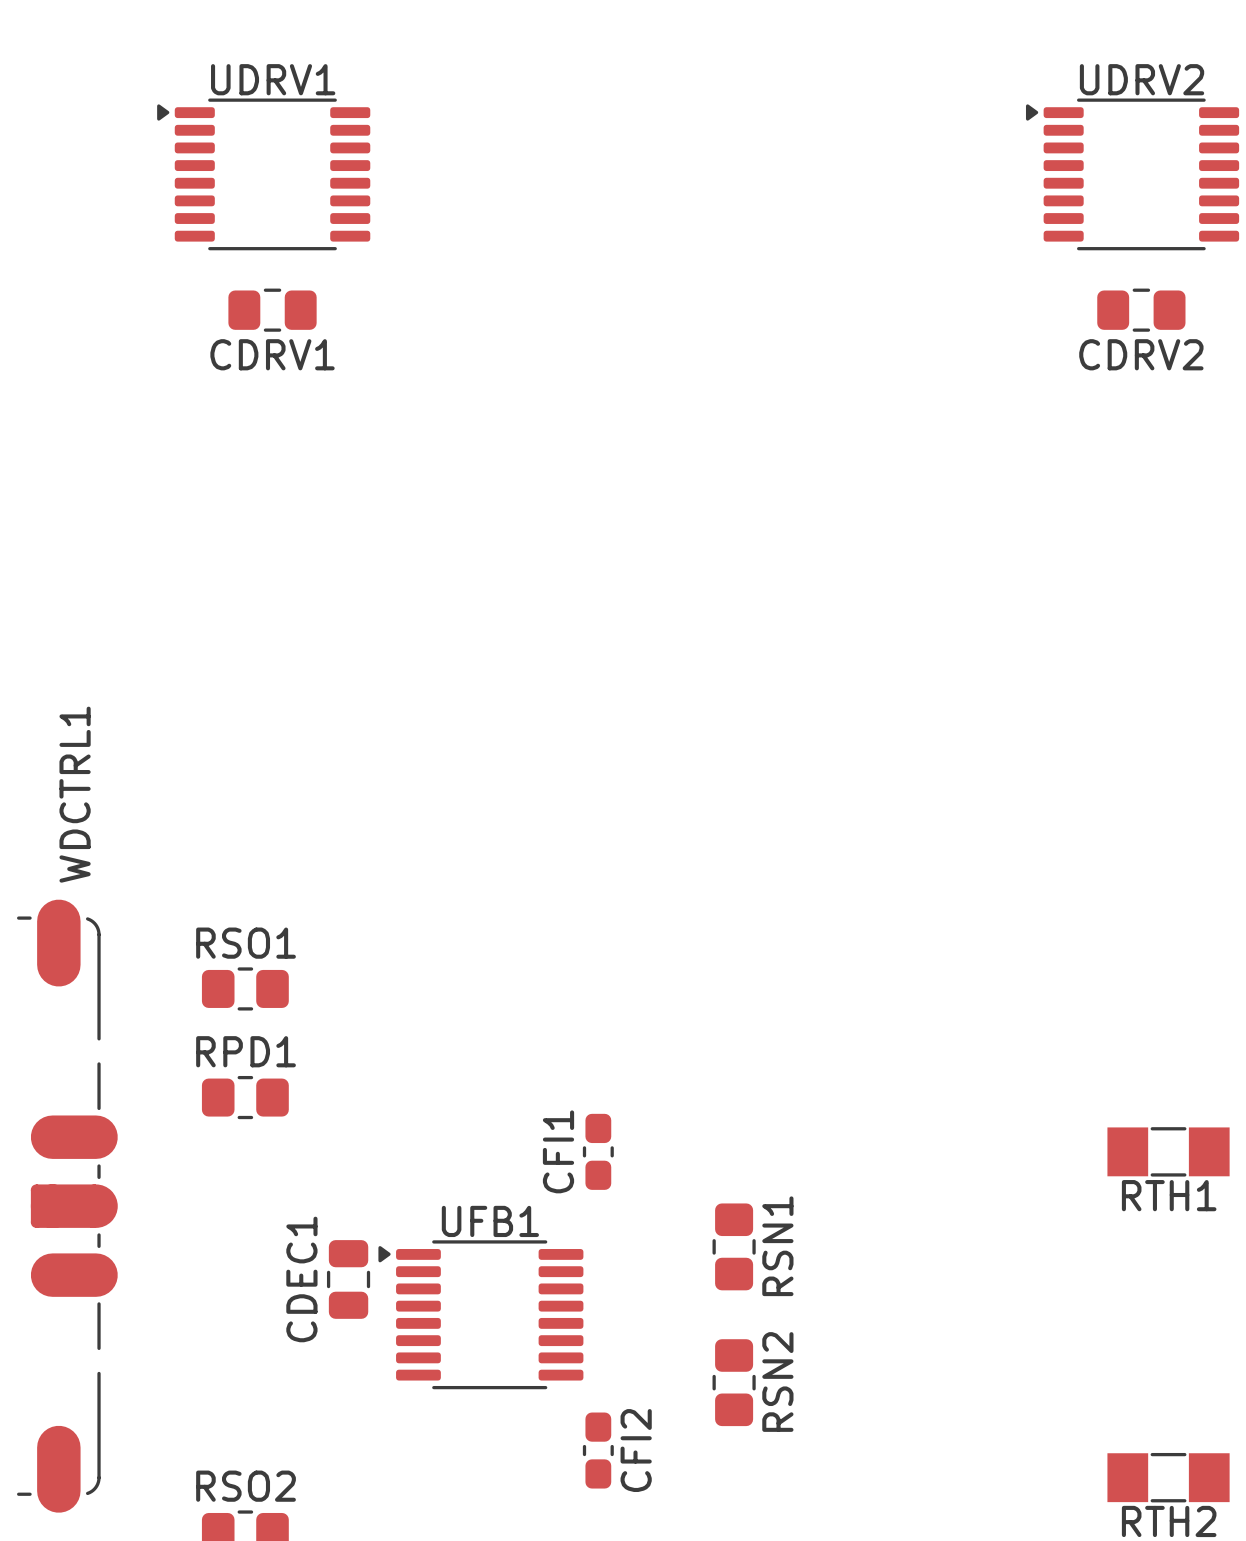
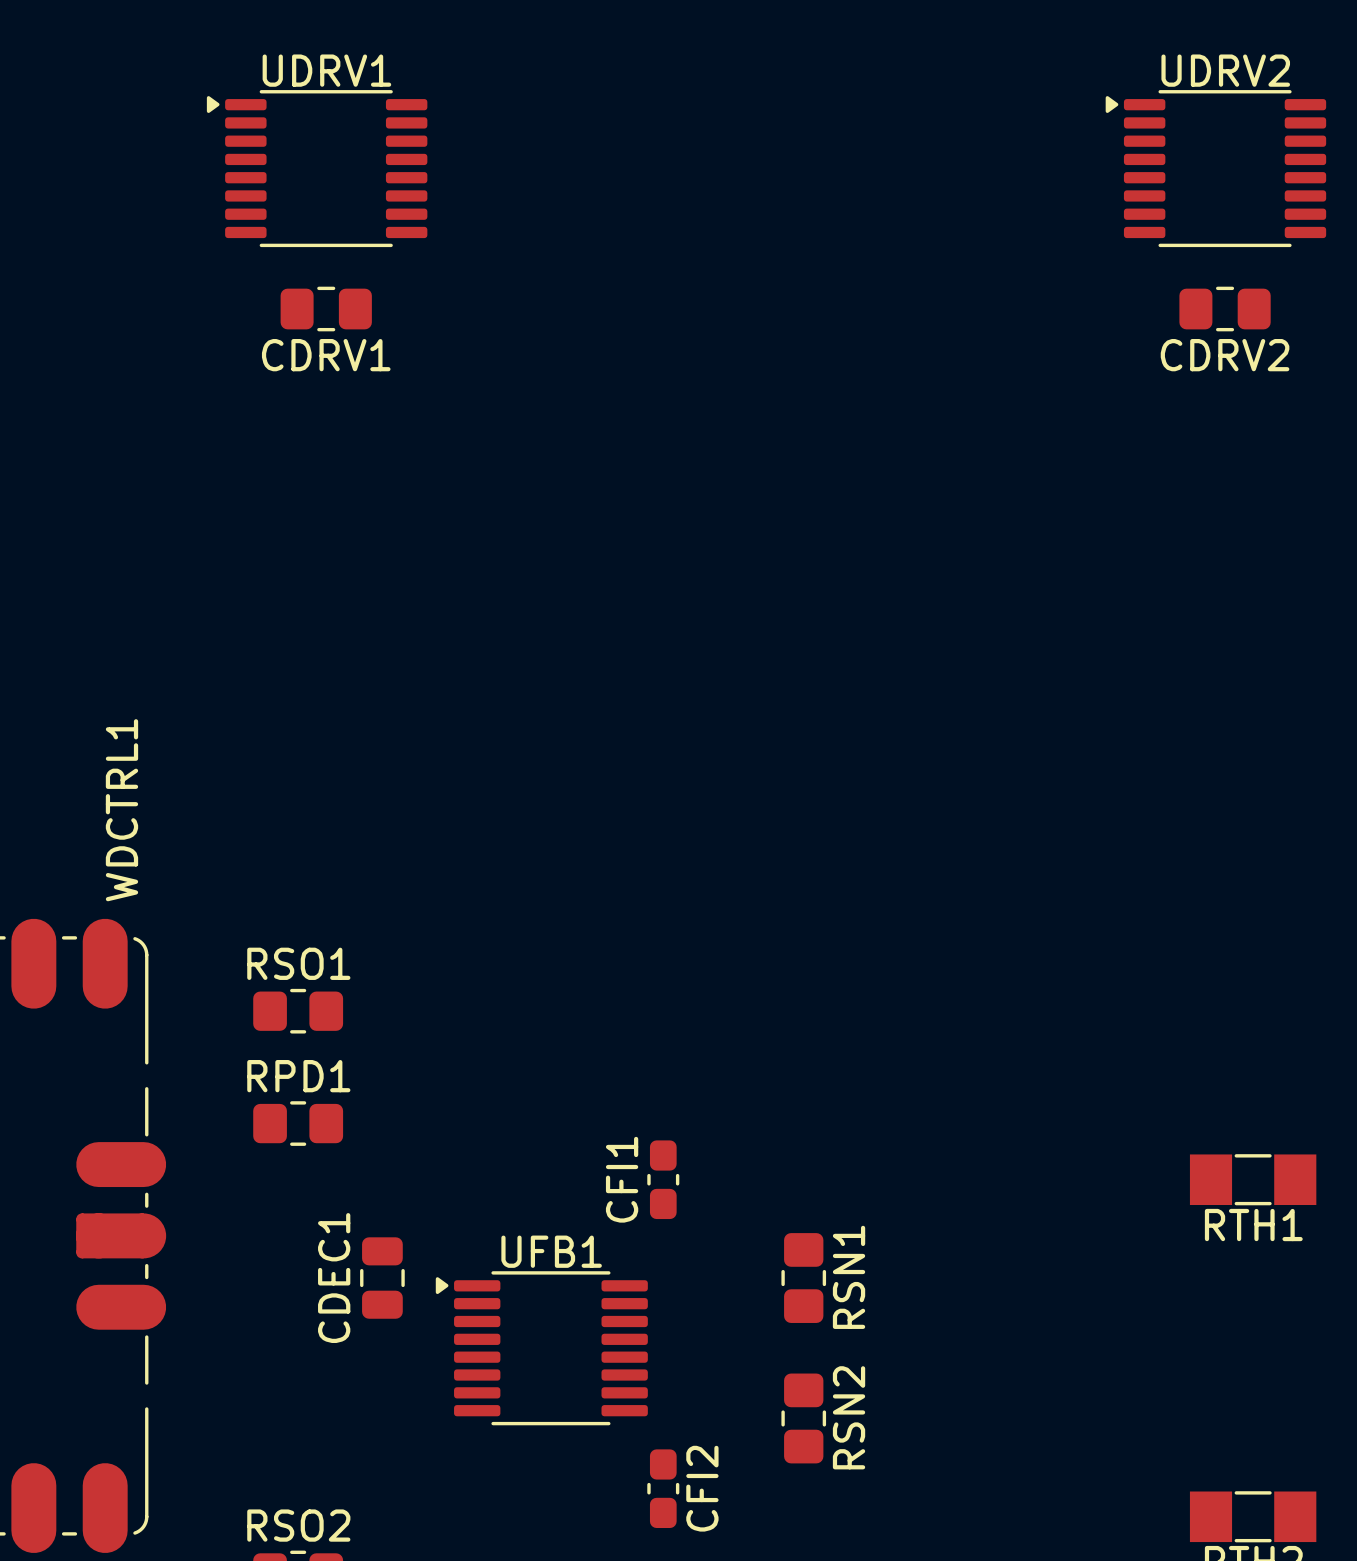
CDEC1 position: (348, 1279) -> (382, 1278)

